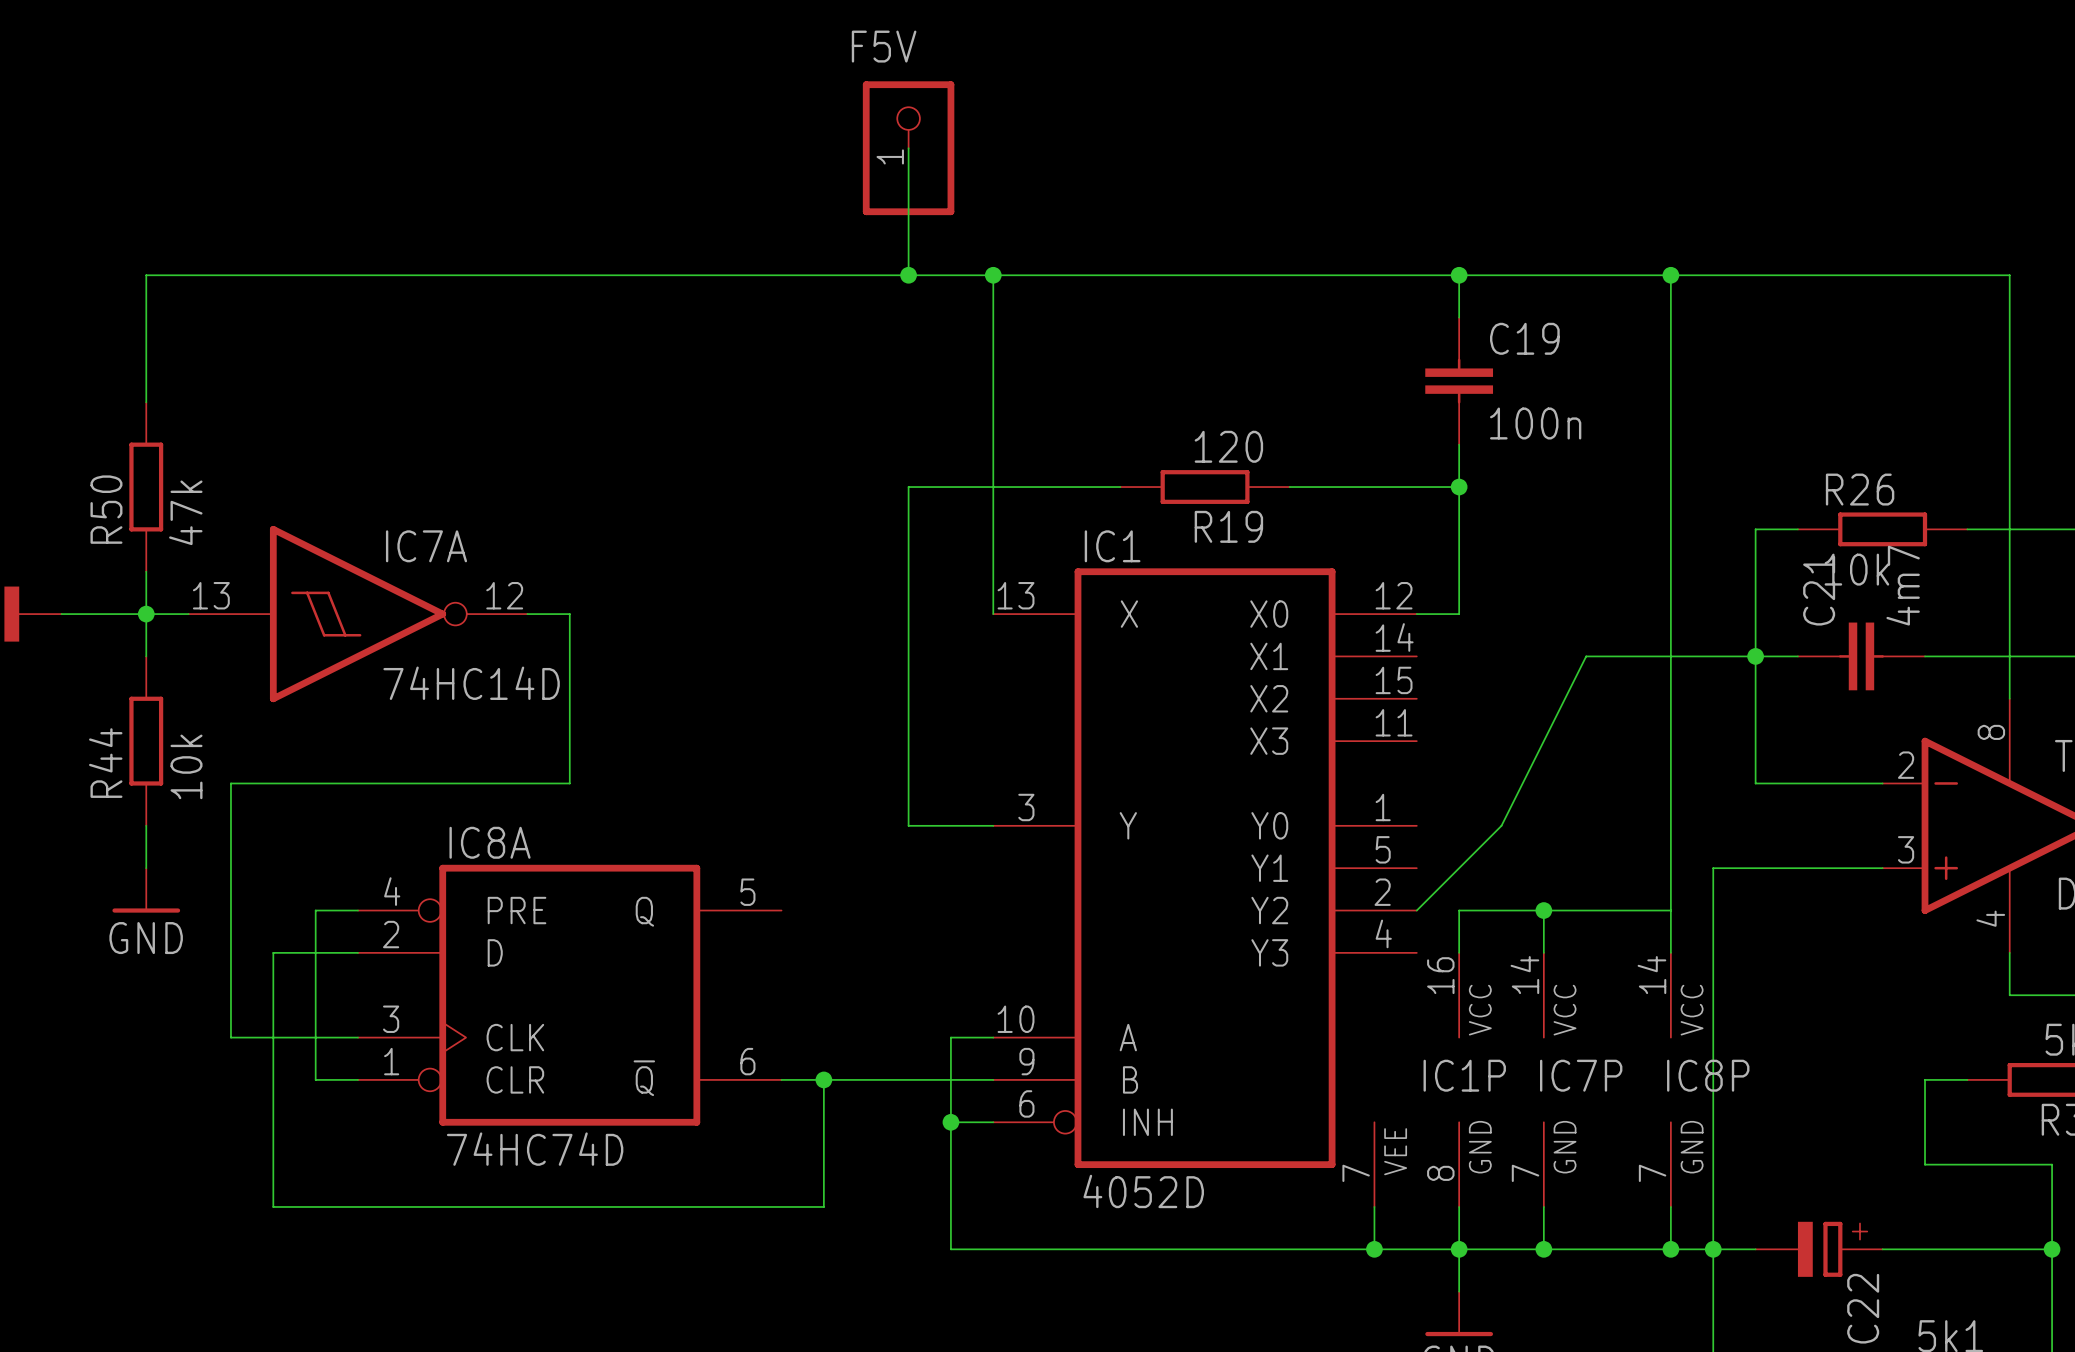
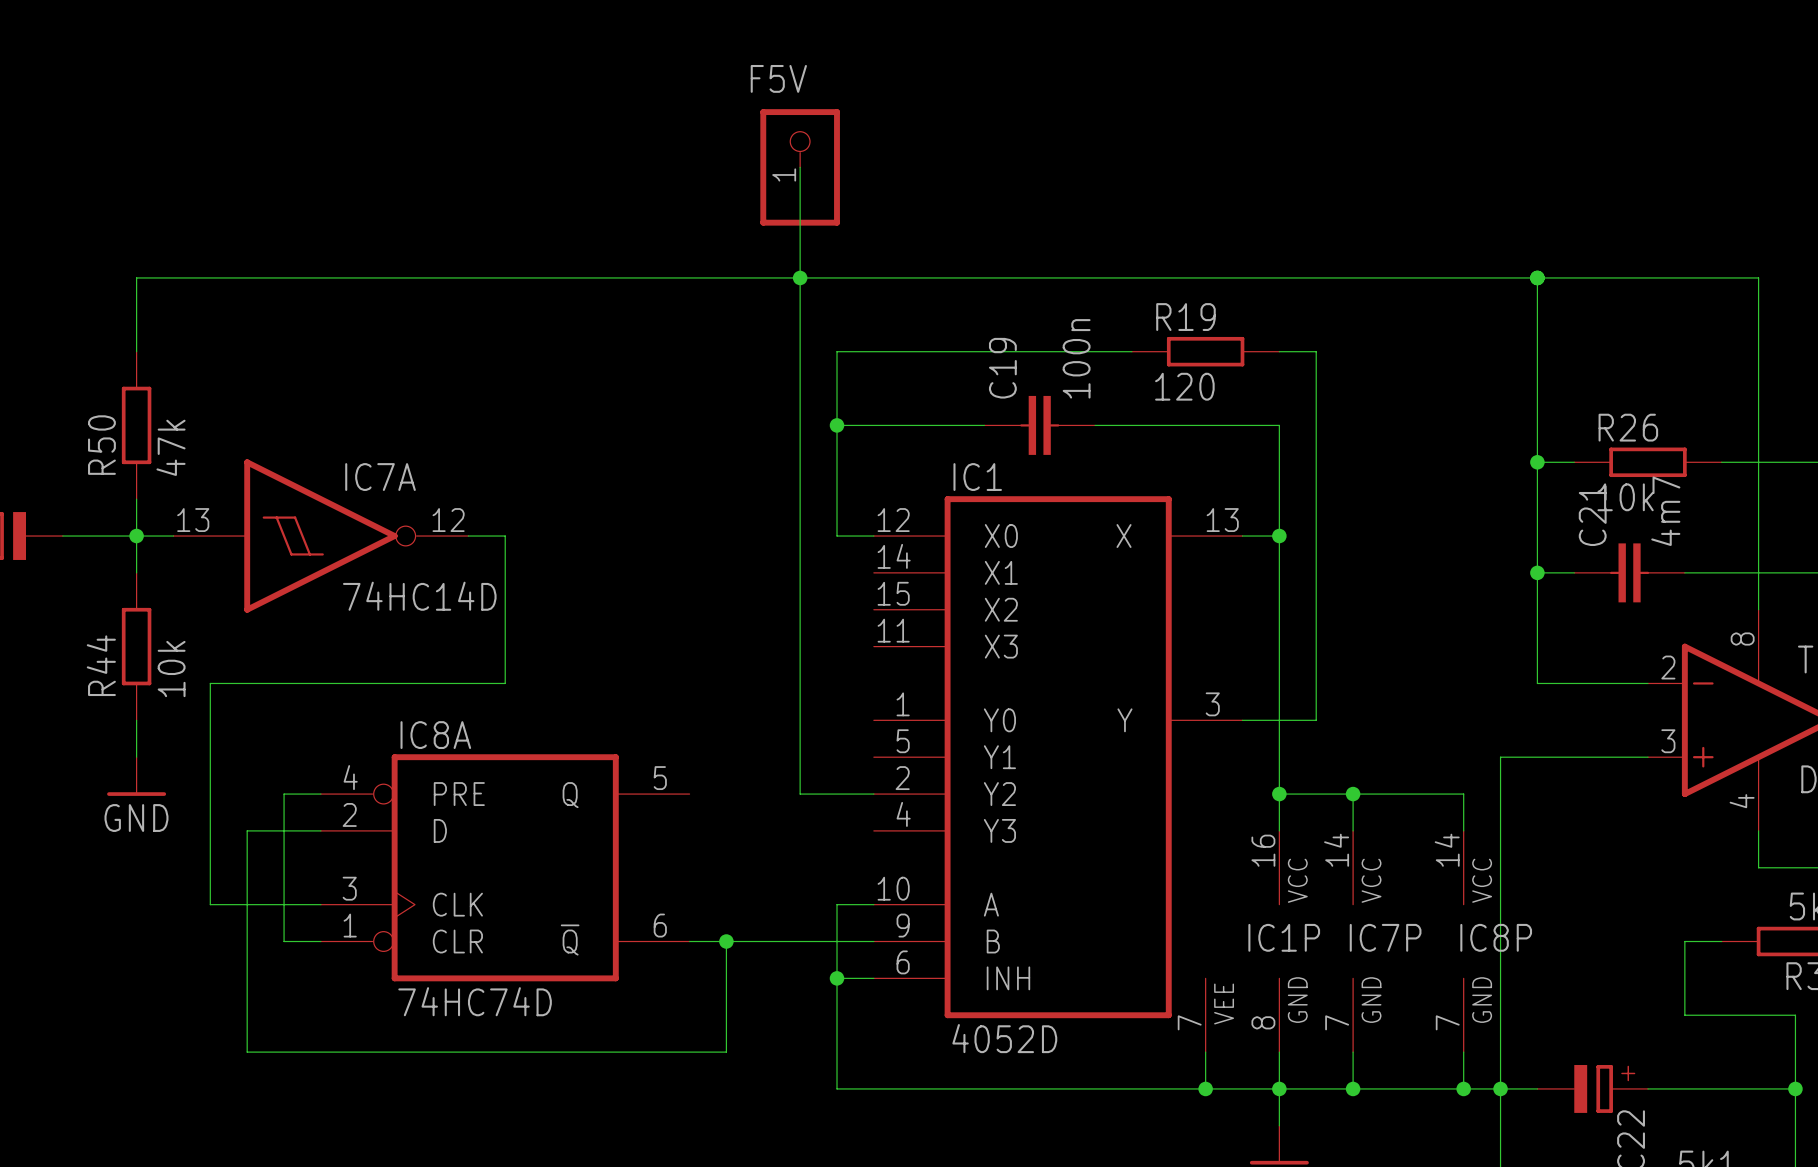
wire: (908, 148) (908, 190) -> none
F5V position: (908, 148) -> (800, 167)
junction position: (908, 275) -> (800, 277)
wire: (993, 275) (993, 614) -> (1131, 351) (837, 351) (837, 536) (873, 536)
junction: (993, 275) -> none
wire: (1459, 275) (1459, 317) -> none
junction: (1459, 275) -> none
wire: (1670, 275) (1670, 910) -> none
junction position: (1670, 275) -> (1537, 277)
wire: (146, 317) (146, 275) (2009, 275) (2009, 317) -> (136, 277) (1758, 277)
wire: none -> (1537, 277) (1537, 462)
C19 name position: C19 (1524, 338) -> C19 (1002, 368)
C19 rotation: 0° (1459, 381) -> 90° clockwise (1039, 425)
C19 position: (1459, 381) -> (1039, 425)
wire: none -> (1279, 351) (1316, 351) (1316, 720) (1242, 720)
C19 value position: 100n (1535, 423) -> 100n (1076, 358)
wire: (1459, 444) (1459, 487) -> none
R19 value position: 120 (1228, 446) -> 120 (1184, 386)
wire: (908, 487) (950, 487) -> (800, 425) (800, 241)
junction: none -> (837, 425)
R19 position: (1205, 487) -> (1205, 351)
junction: (1459, 487) -> none
R19 name position: R19 (1228, 526) -> R19 (1185, 317)
junction: none -> (1537, 462)
IC1 symbol: [993, 568, 1417, 1169] -> [873, 496, 1243, 1019]
wire: none -> (1279, 536) (1279, 794)
junction: none -> (1279, 536)
wire: (1755, 656) (1586, 656) (1501, 825) (1416, 910) -> none
wire: (908, 825) (993, 825) -> (800, 720) (800, 794) (873, 794)
junction: none -> (1279, 794)

